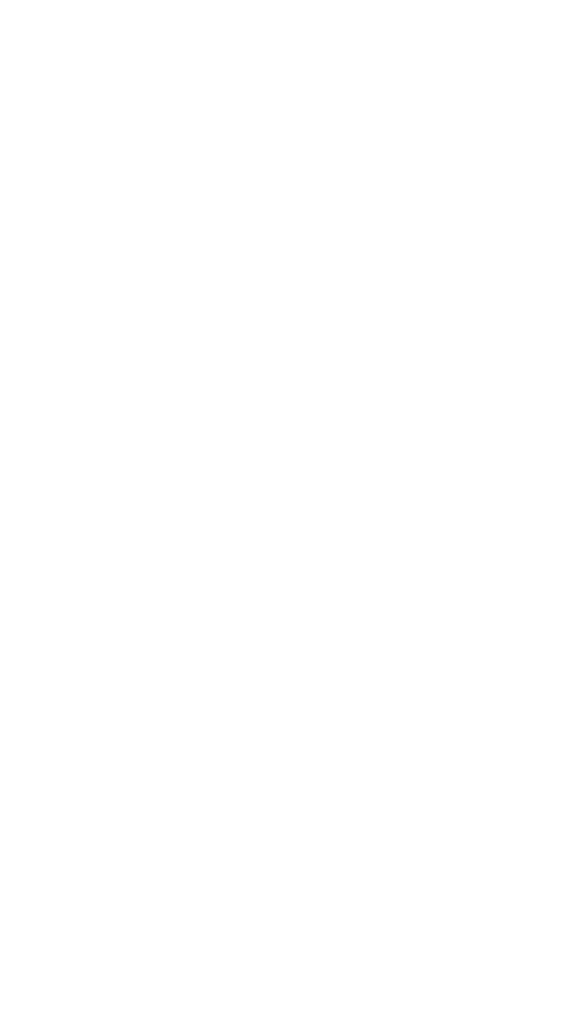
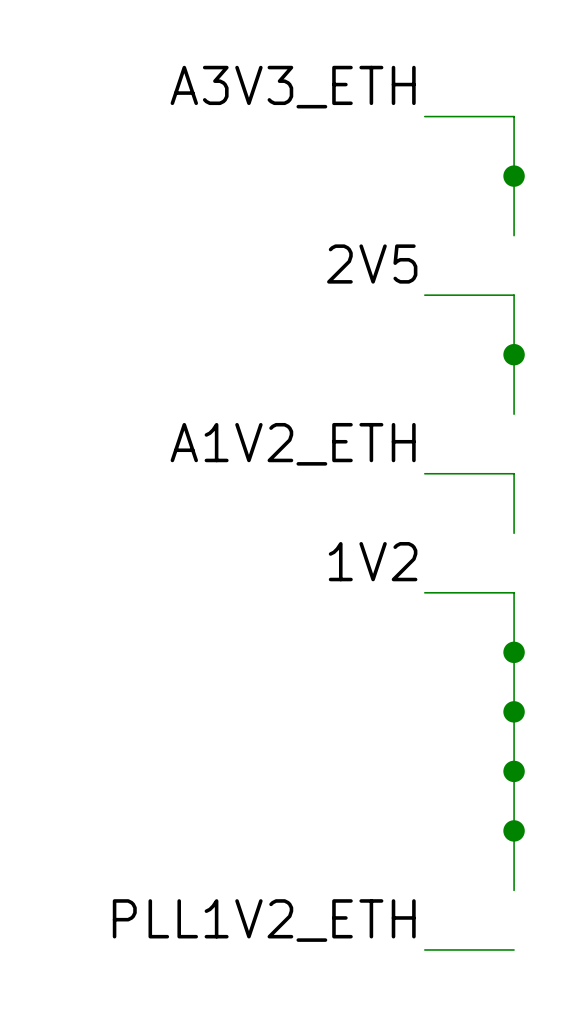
label: none -> A3V3_ETH (293, 87)
wire: none -> (424, 116) (514, 116) (514, 235)
junction: none -> (514, 176)
label: none -> 2V5 (372, 264)
wire: none -> (424, 295) (514, 295) (514, 414)
junction: none -> (514, 354)
label: none -> A1V2_ETH (293, 444)
wire: none -> (424, 473) (514, 473) (514, 533)
label: none -> 1V2 (373, 561)
wire: none -> (424, 592) (514, 592) (514, 890)
junction: none -> (514, 652)
junction: none -> (514, 711)
junction: none -> (514, 771)
junction: none -> (514, 830)
label: none -> PLL1V2_ETH (264, 920)
wire: none -> (424, 949) (514, 949)

